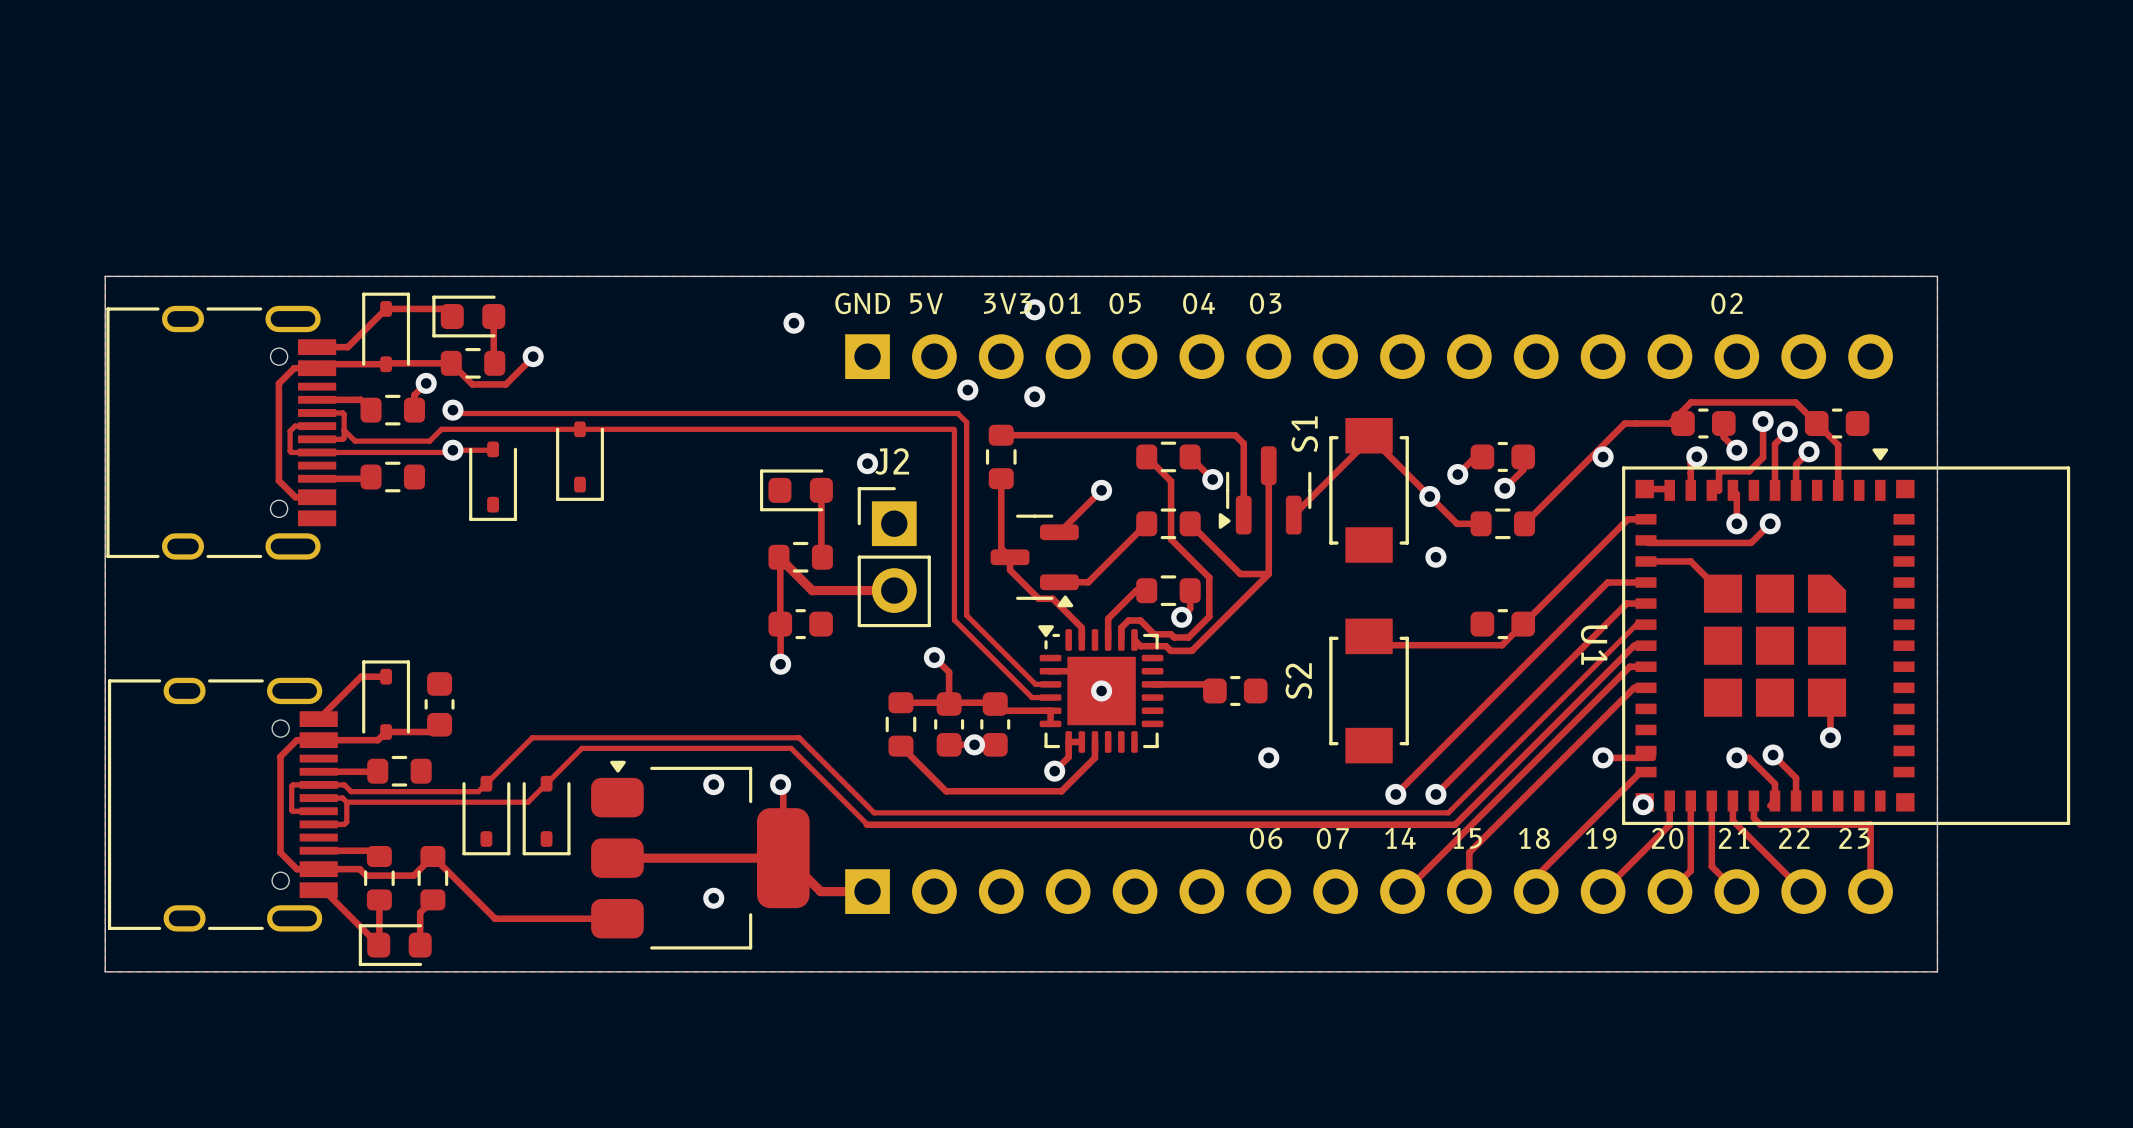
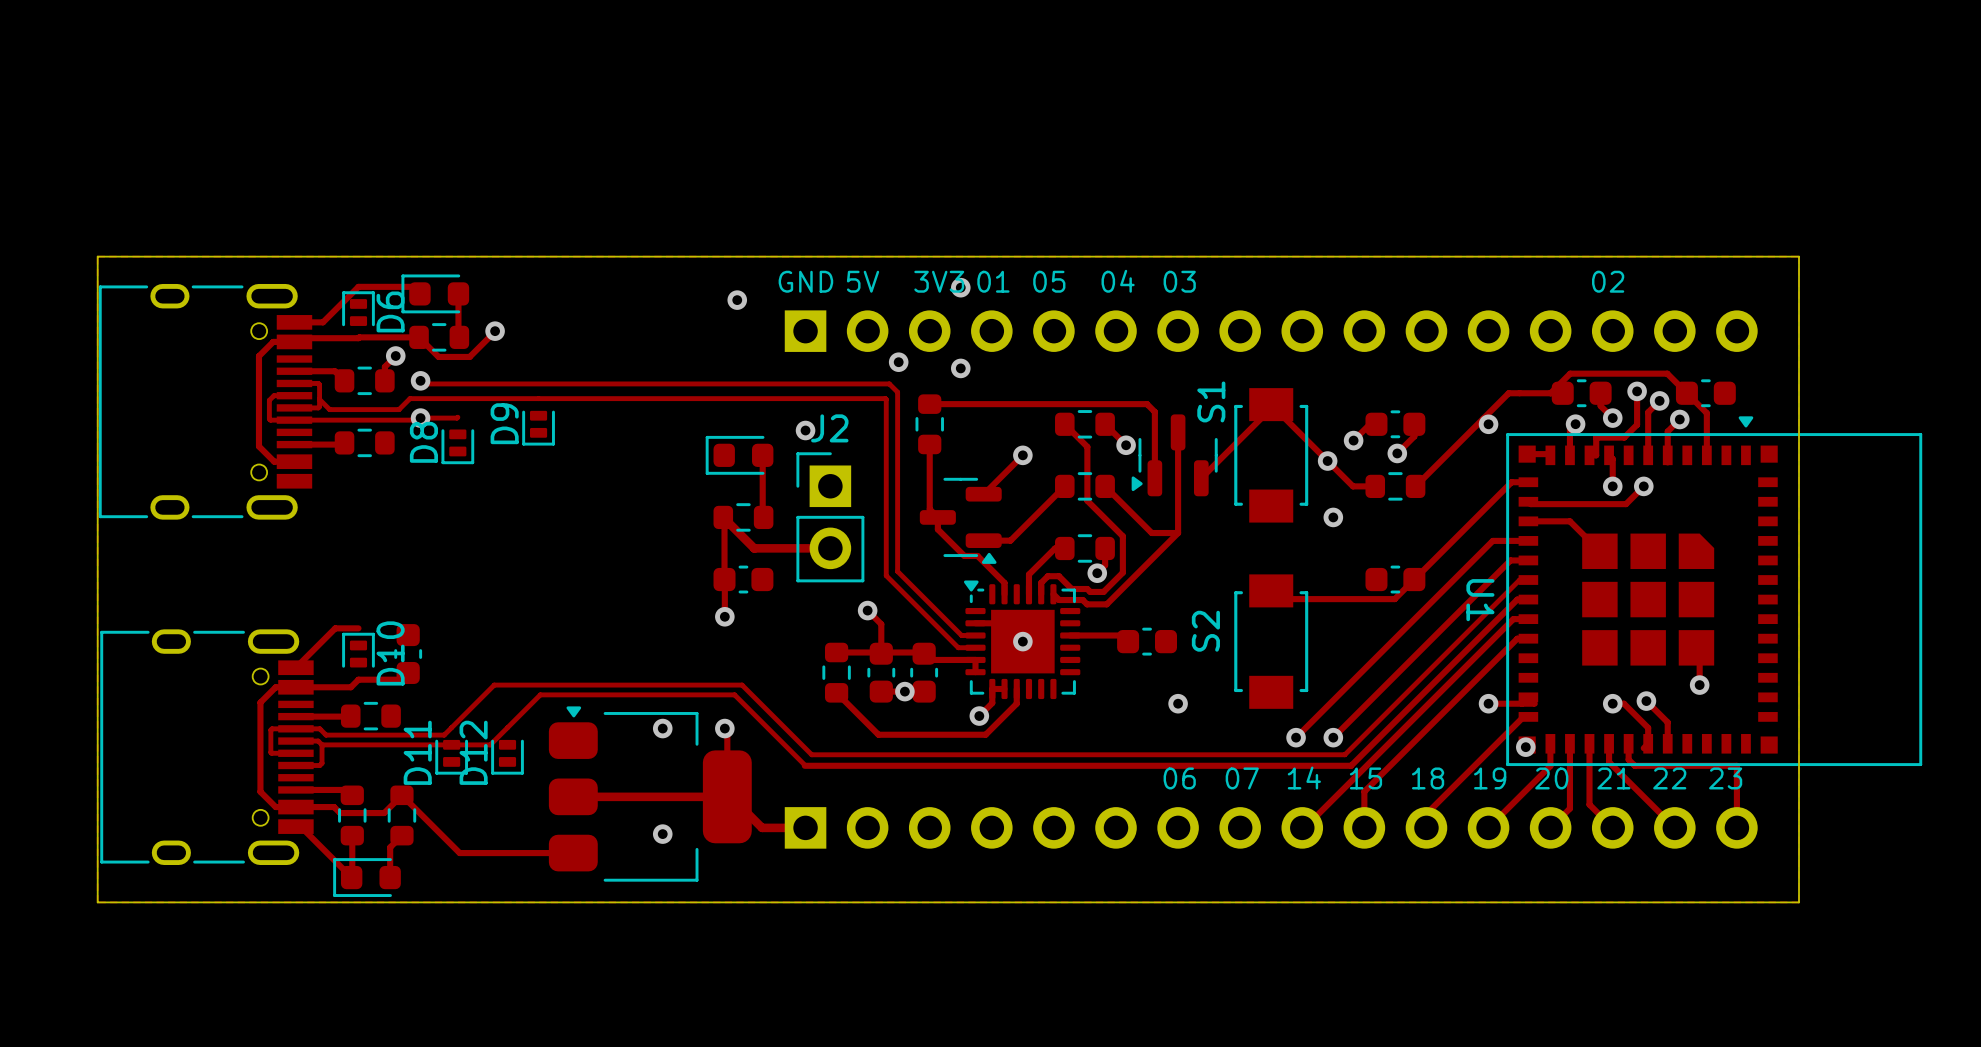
part: (386, 332) -> none
D6: none -> (358, 308)
part: (580, 461) -> none
D9: none -> (538, 428)
part: (493, 481) -> none
D8: none -> (457, 446)
part: (386, 700) -> none
D10: none -> (358, 650)
part: (486, 815) -> none
D11: none -> (451, 757)
part: (546, 815) -> none
D12: none -> (507, 757)

